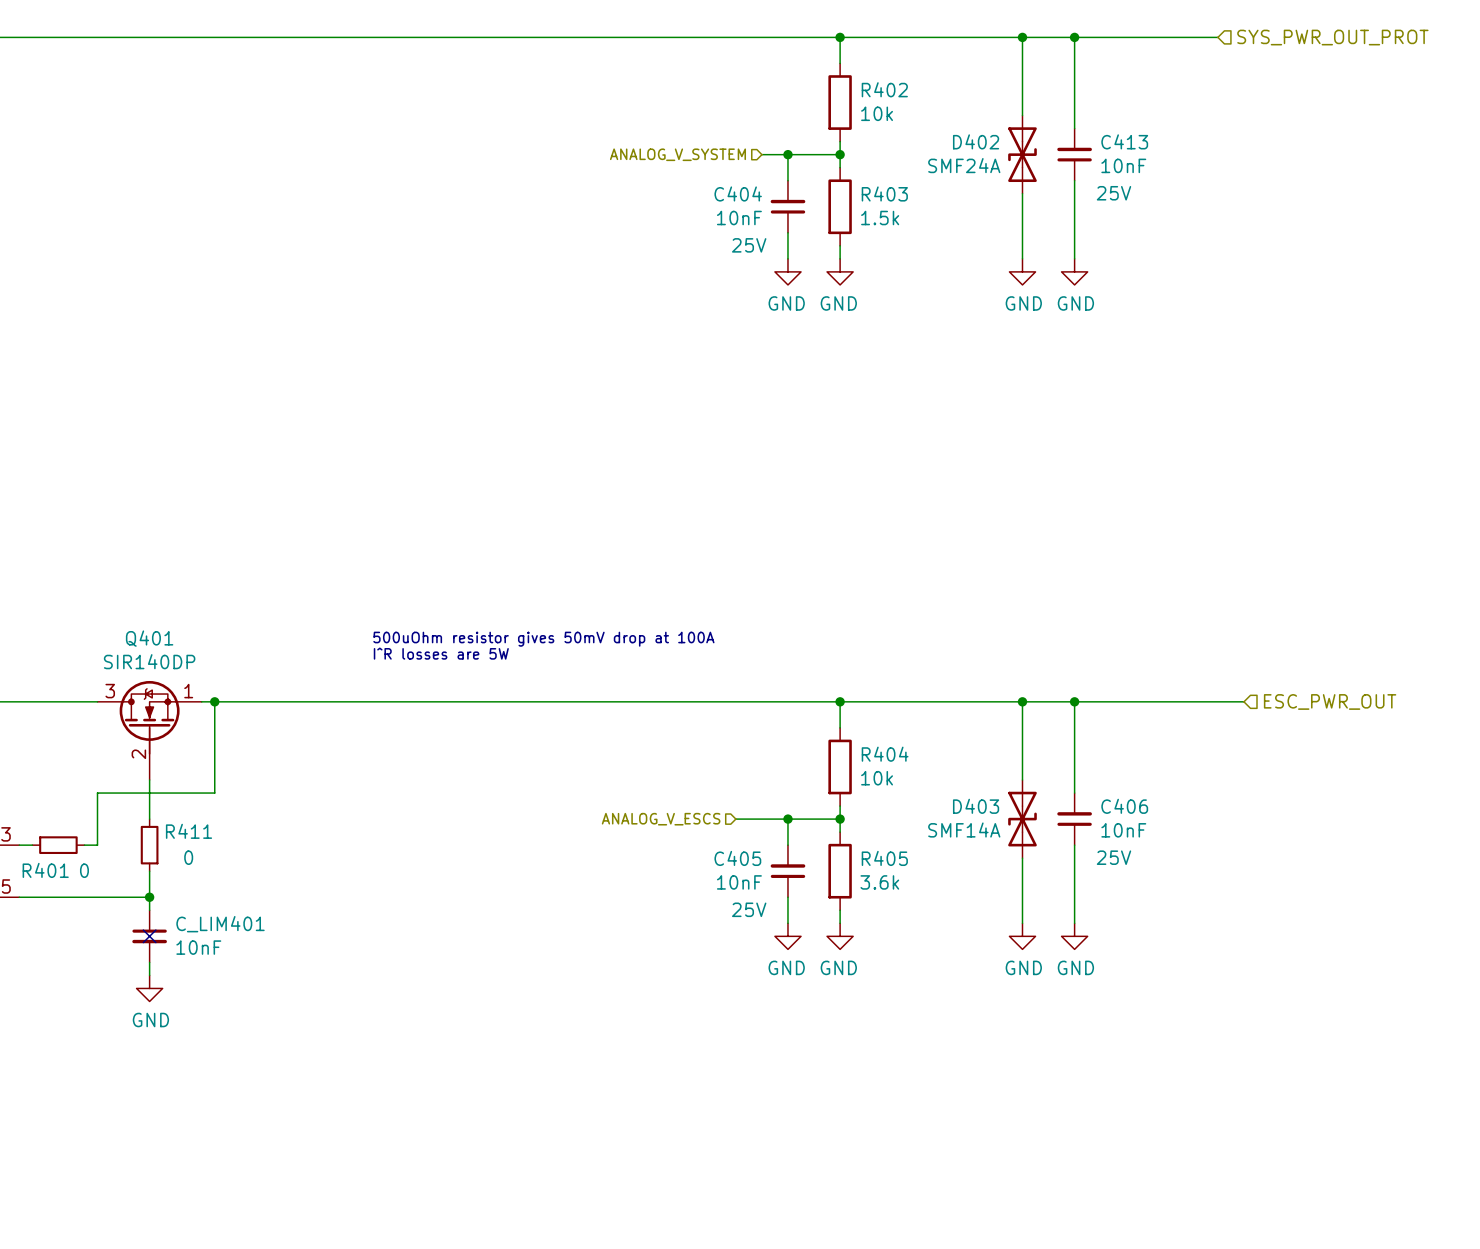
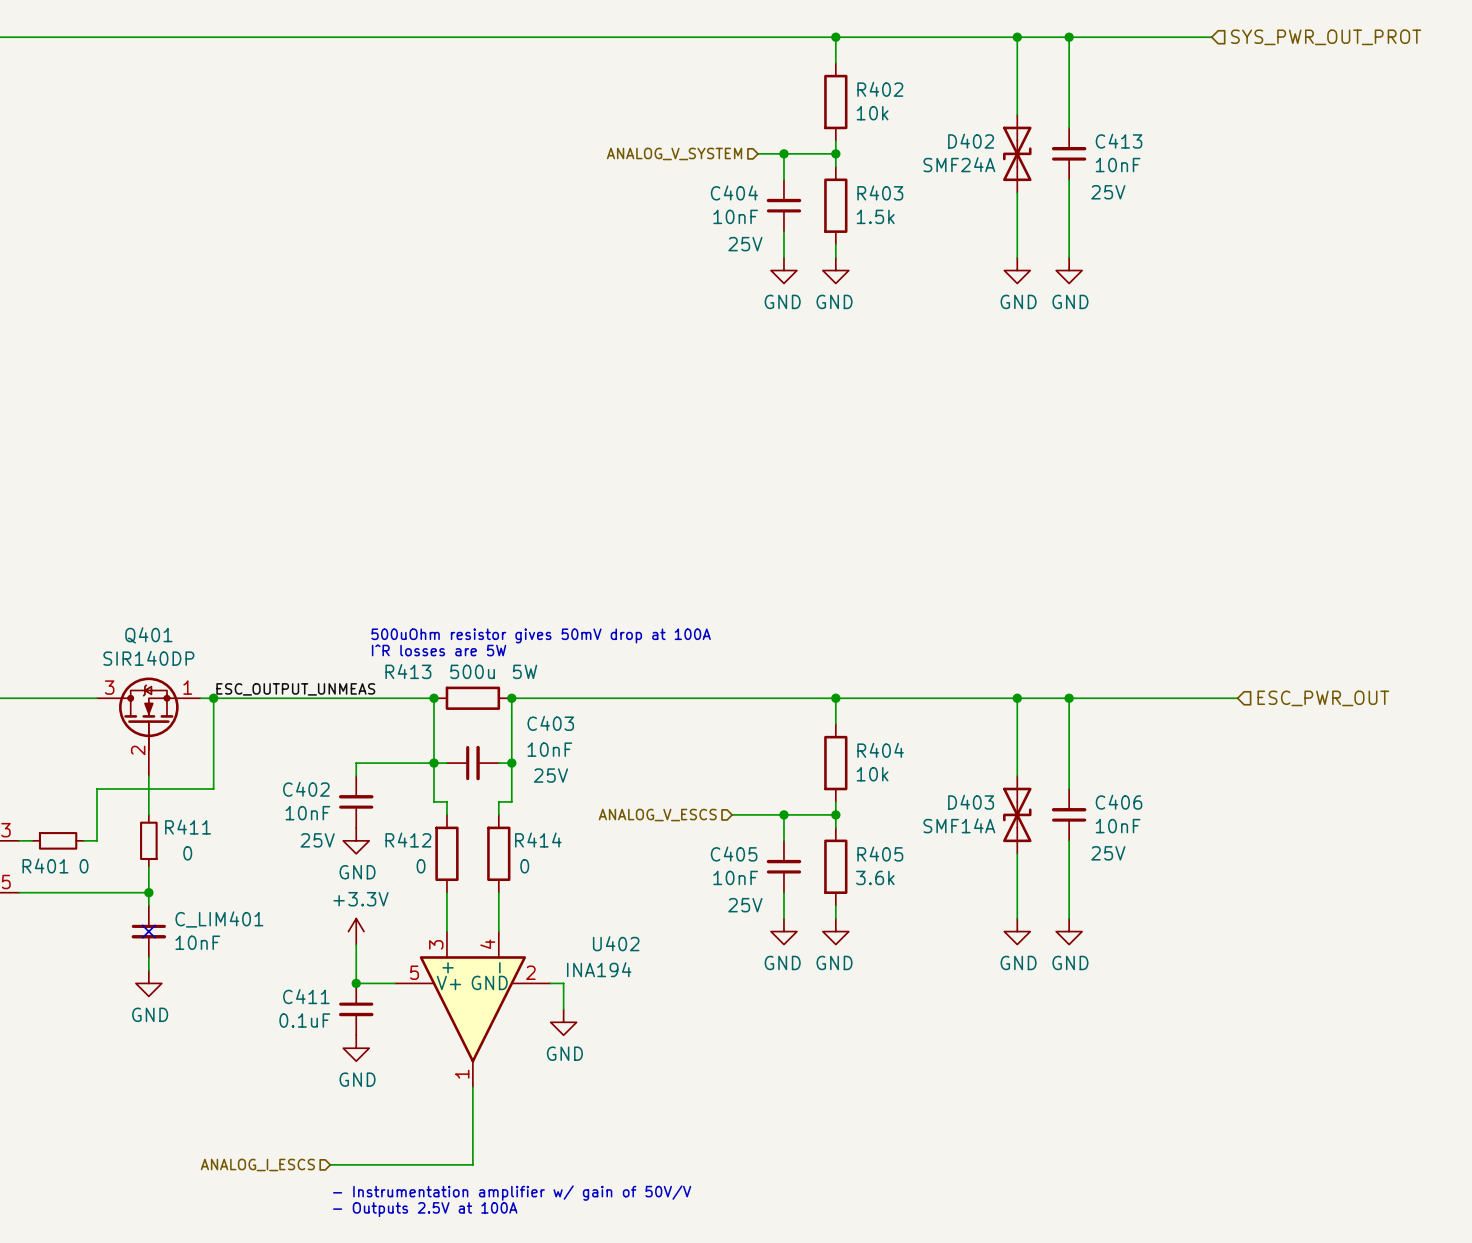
label: none -> ESC_OUTPUT_UNMEAS (295, 689)
wire: (436, 701) (514, 701) -> (434, 698) (434, 801) (446, 801) (446, 814)
junction: none -> (434, 698)
R413: none -> 500u (472, 698)
wire: none -> (511, 698) (511, 801) (498, 801) (498, 814)
junction: none -> (511, 698)
junction: none -> (434, 763)
wire: none -> (446, 763) (356, 763) (356, 776)
C403: none -> 10nF (472, 763)
wire: none -> (498, 763) (511, 763)
junction: none -> (511, 763)
C402: none -> 10nF (356, 801)
power symbol: none -> GND (356, 840)
R412: none -> 0 (446, 853)
R414: none -> 0 (498, 853)
wire: none -> (446, 892) (446, 931)
wire: none -> (498, 892) (498, 931)
power symbol: none -> +3.3V (356, 931)
wire: none -> (356, 944) (356, 983) (395, 983)
junction: none -> (356, 983)
wire: none -> (550, 983) (563, 983) (563, 1009)
C411: none -> 0.1uF (356, 1009)
U402: none -> INA194 (472, 1009)
power symbol: none -> GND (563, 1022)
power symbol: none -> GND (356, 1048)
wire: none -> (472, 1087) (472, 1164) (330, 1164)
hierarchical label: none -> ANALOG_I_ESCS (257, 1164)
text: none -> - Instrumentation amplifier w/ gain of 50V/V (512, 1193)
text: none -> - Outputs 2.5V at 100A (425, 1209)

